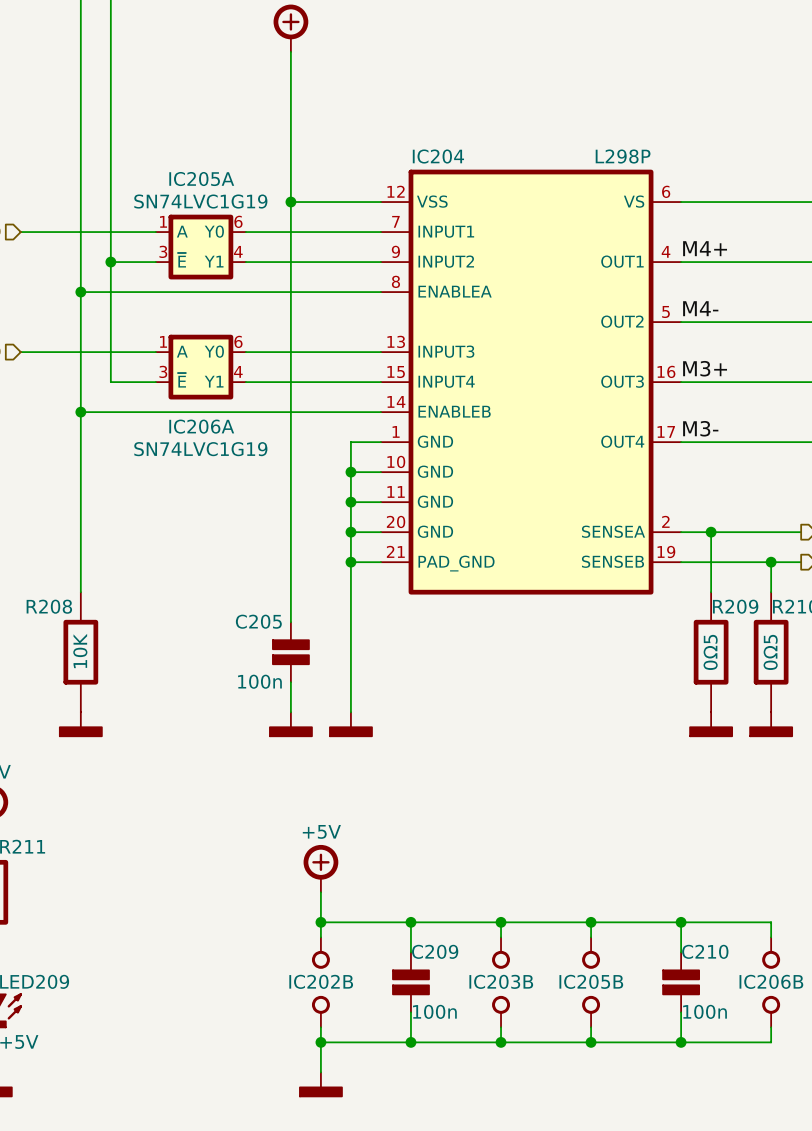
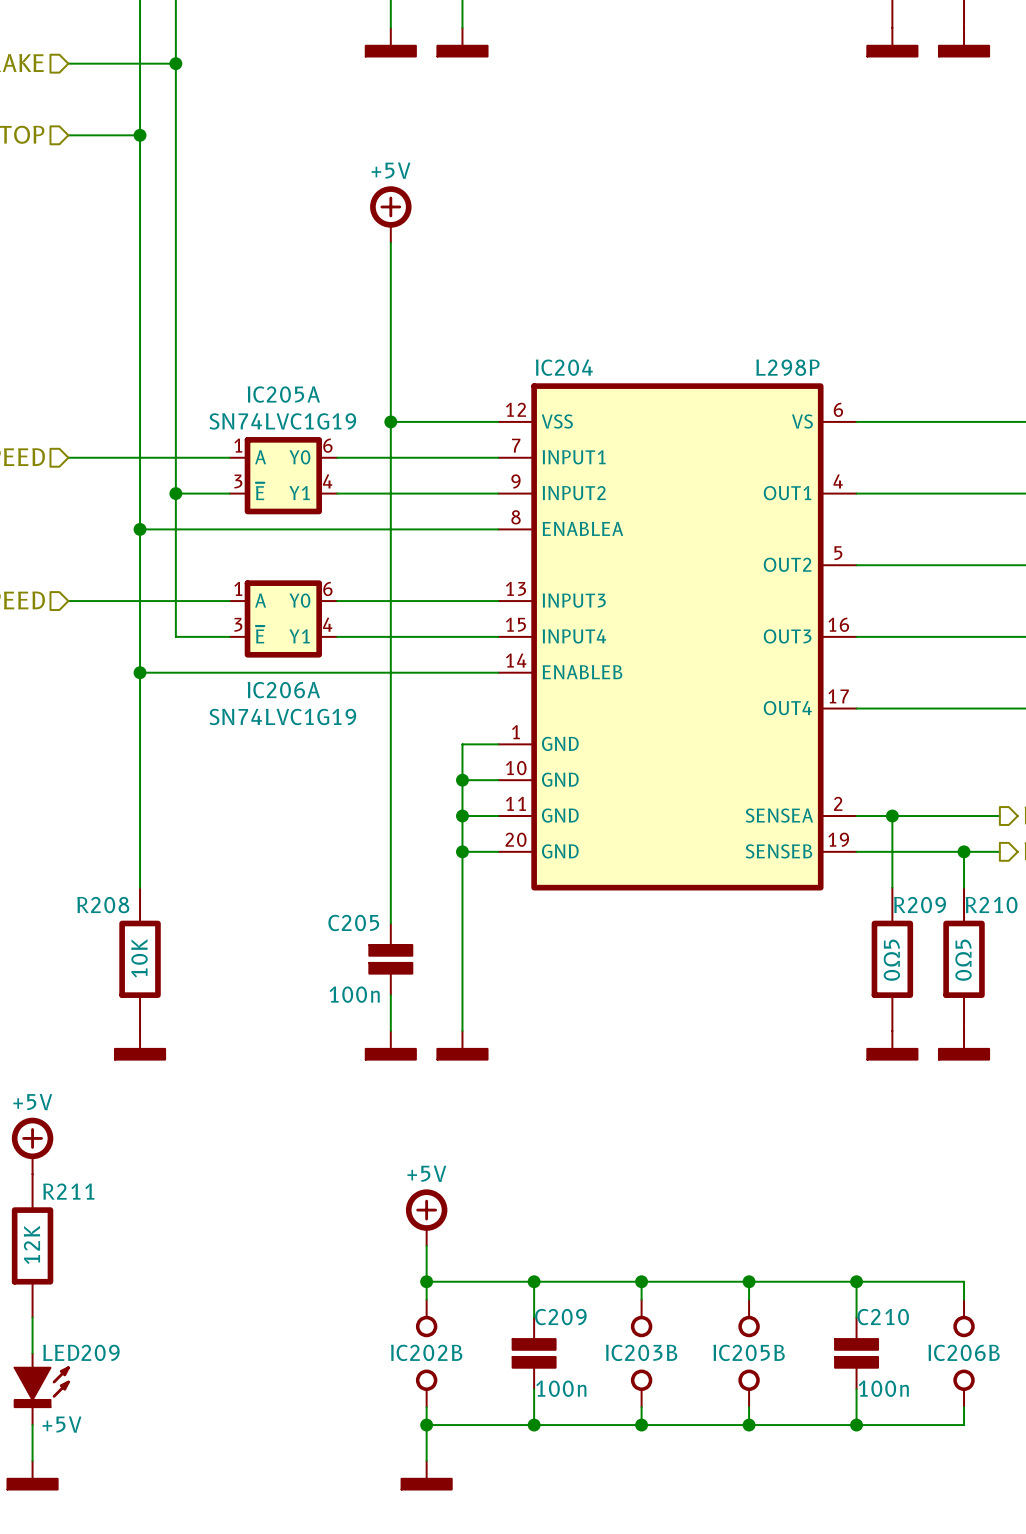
IC204 symbol: [380, 169, 682, 595] -> [498, 383, 857, 891]
label: M4+ (705, 248) -> none
label: M4- (700, 308) -> none
label: M3+ (705, 368) -> none
label: M3- (700, 428) -> none
wire: (380, 442) (350, 442) (350, 472) -> none
junction: (350, 472) -> none

